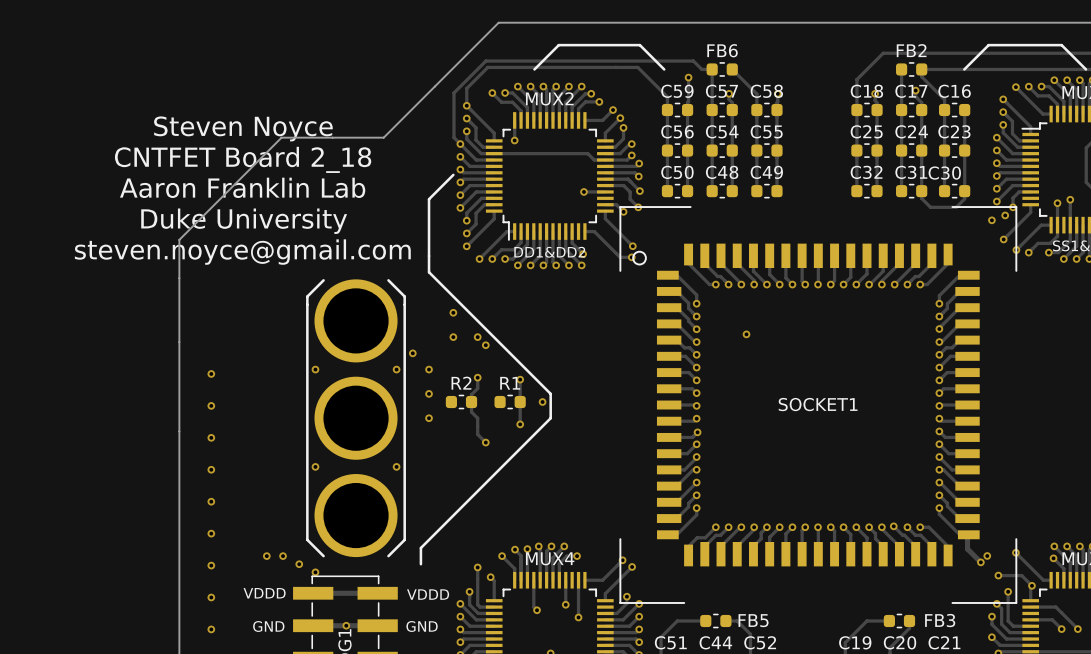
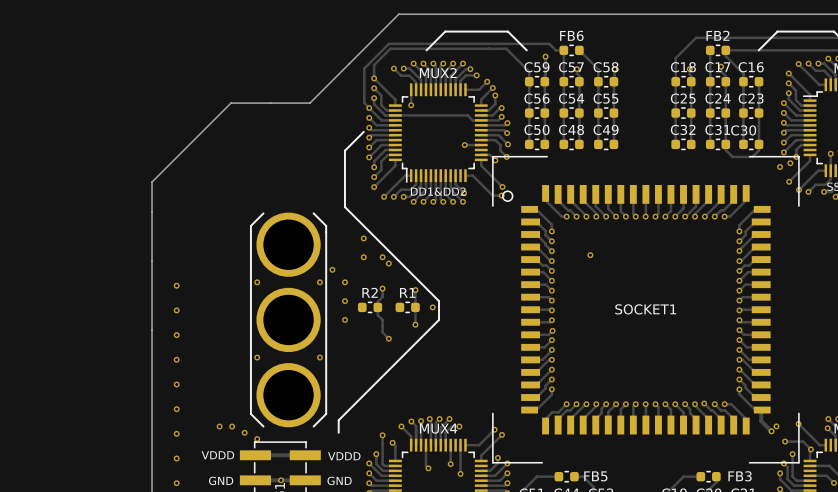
text: Steven Noyce (243, 128) -> none
text: CNTFET Board 2_18 (243, 159) -> none
text: Aaron Franklin Lab (242, 187) -> none
text: Duke University (244, 221) -> none
text: steven.noyce@gmail.com (242, 252) -> none

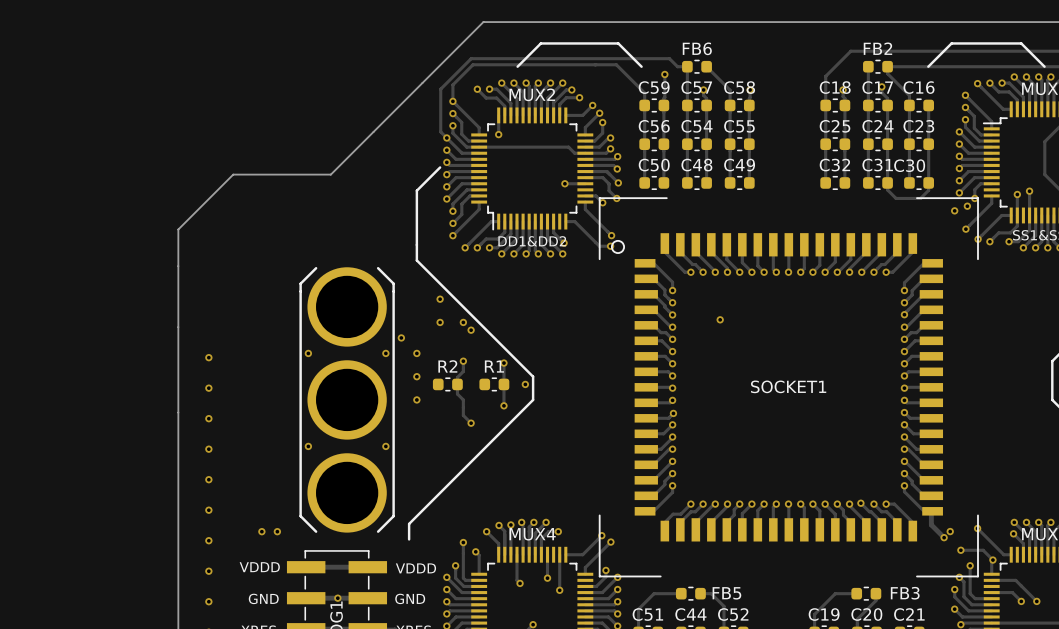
board edge: (309, 103) (231, 103) (196, 137) -> (373, 131) (330, 174) (233, 174)
via: (244, 432) -> none
via: (257, 439) -> none

